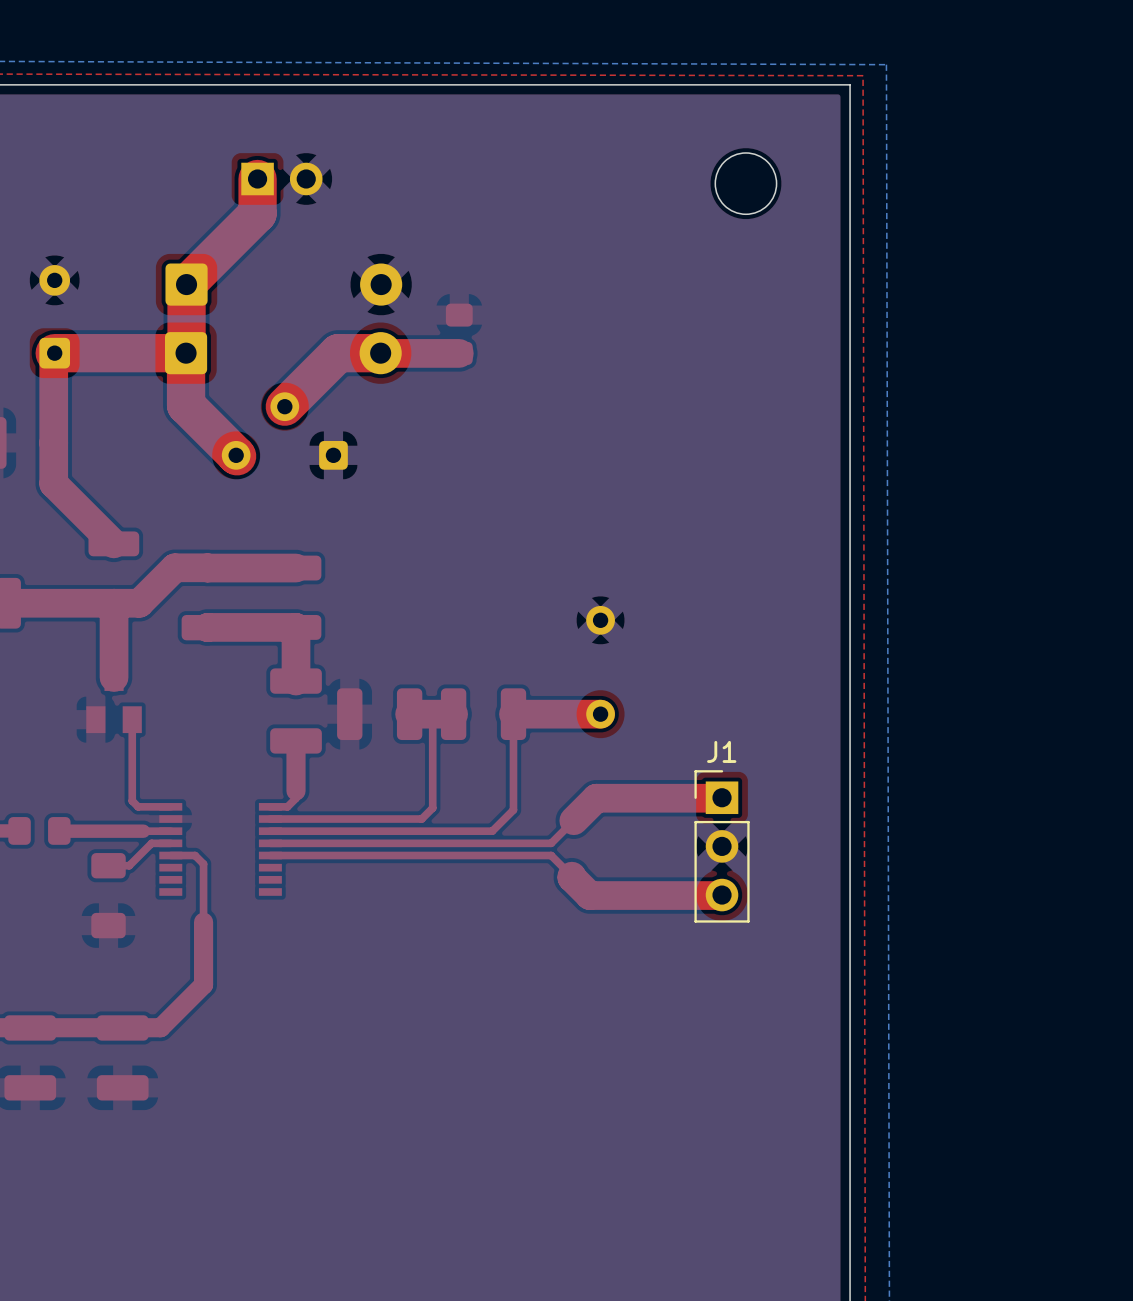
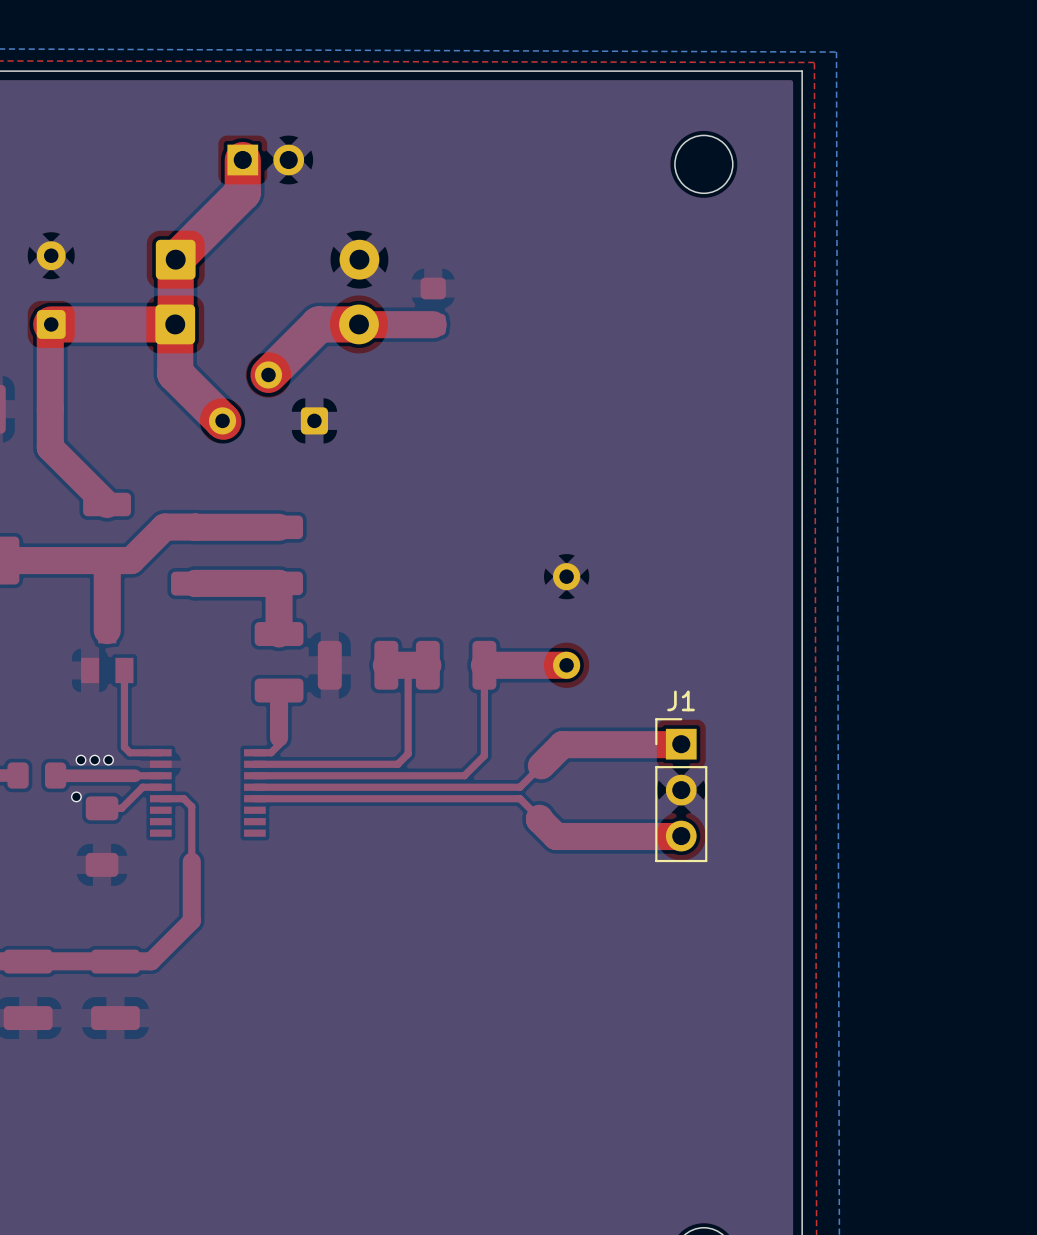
via: none -> (80, 760)
via: none -> (94, 760)
via: none -> (108, 760)
via: none -> (76, 796)

